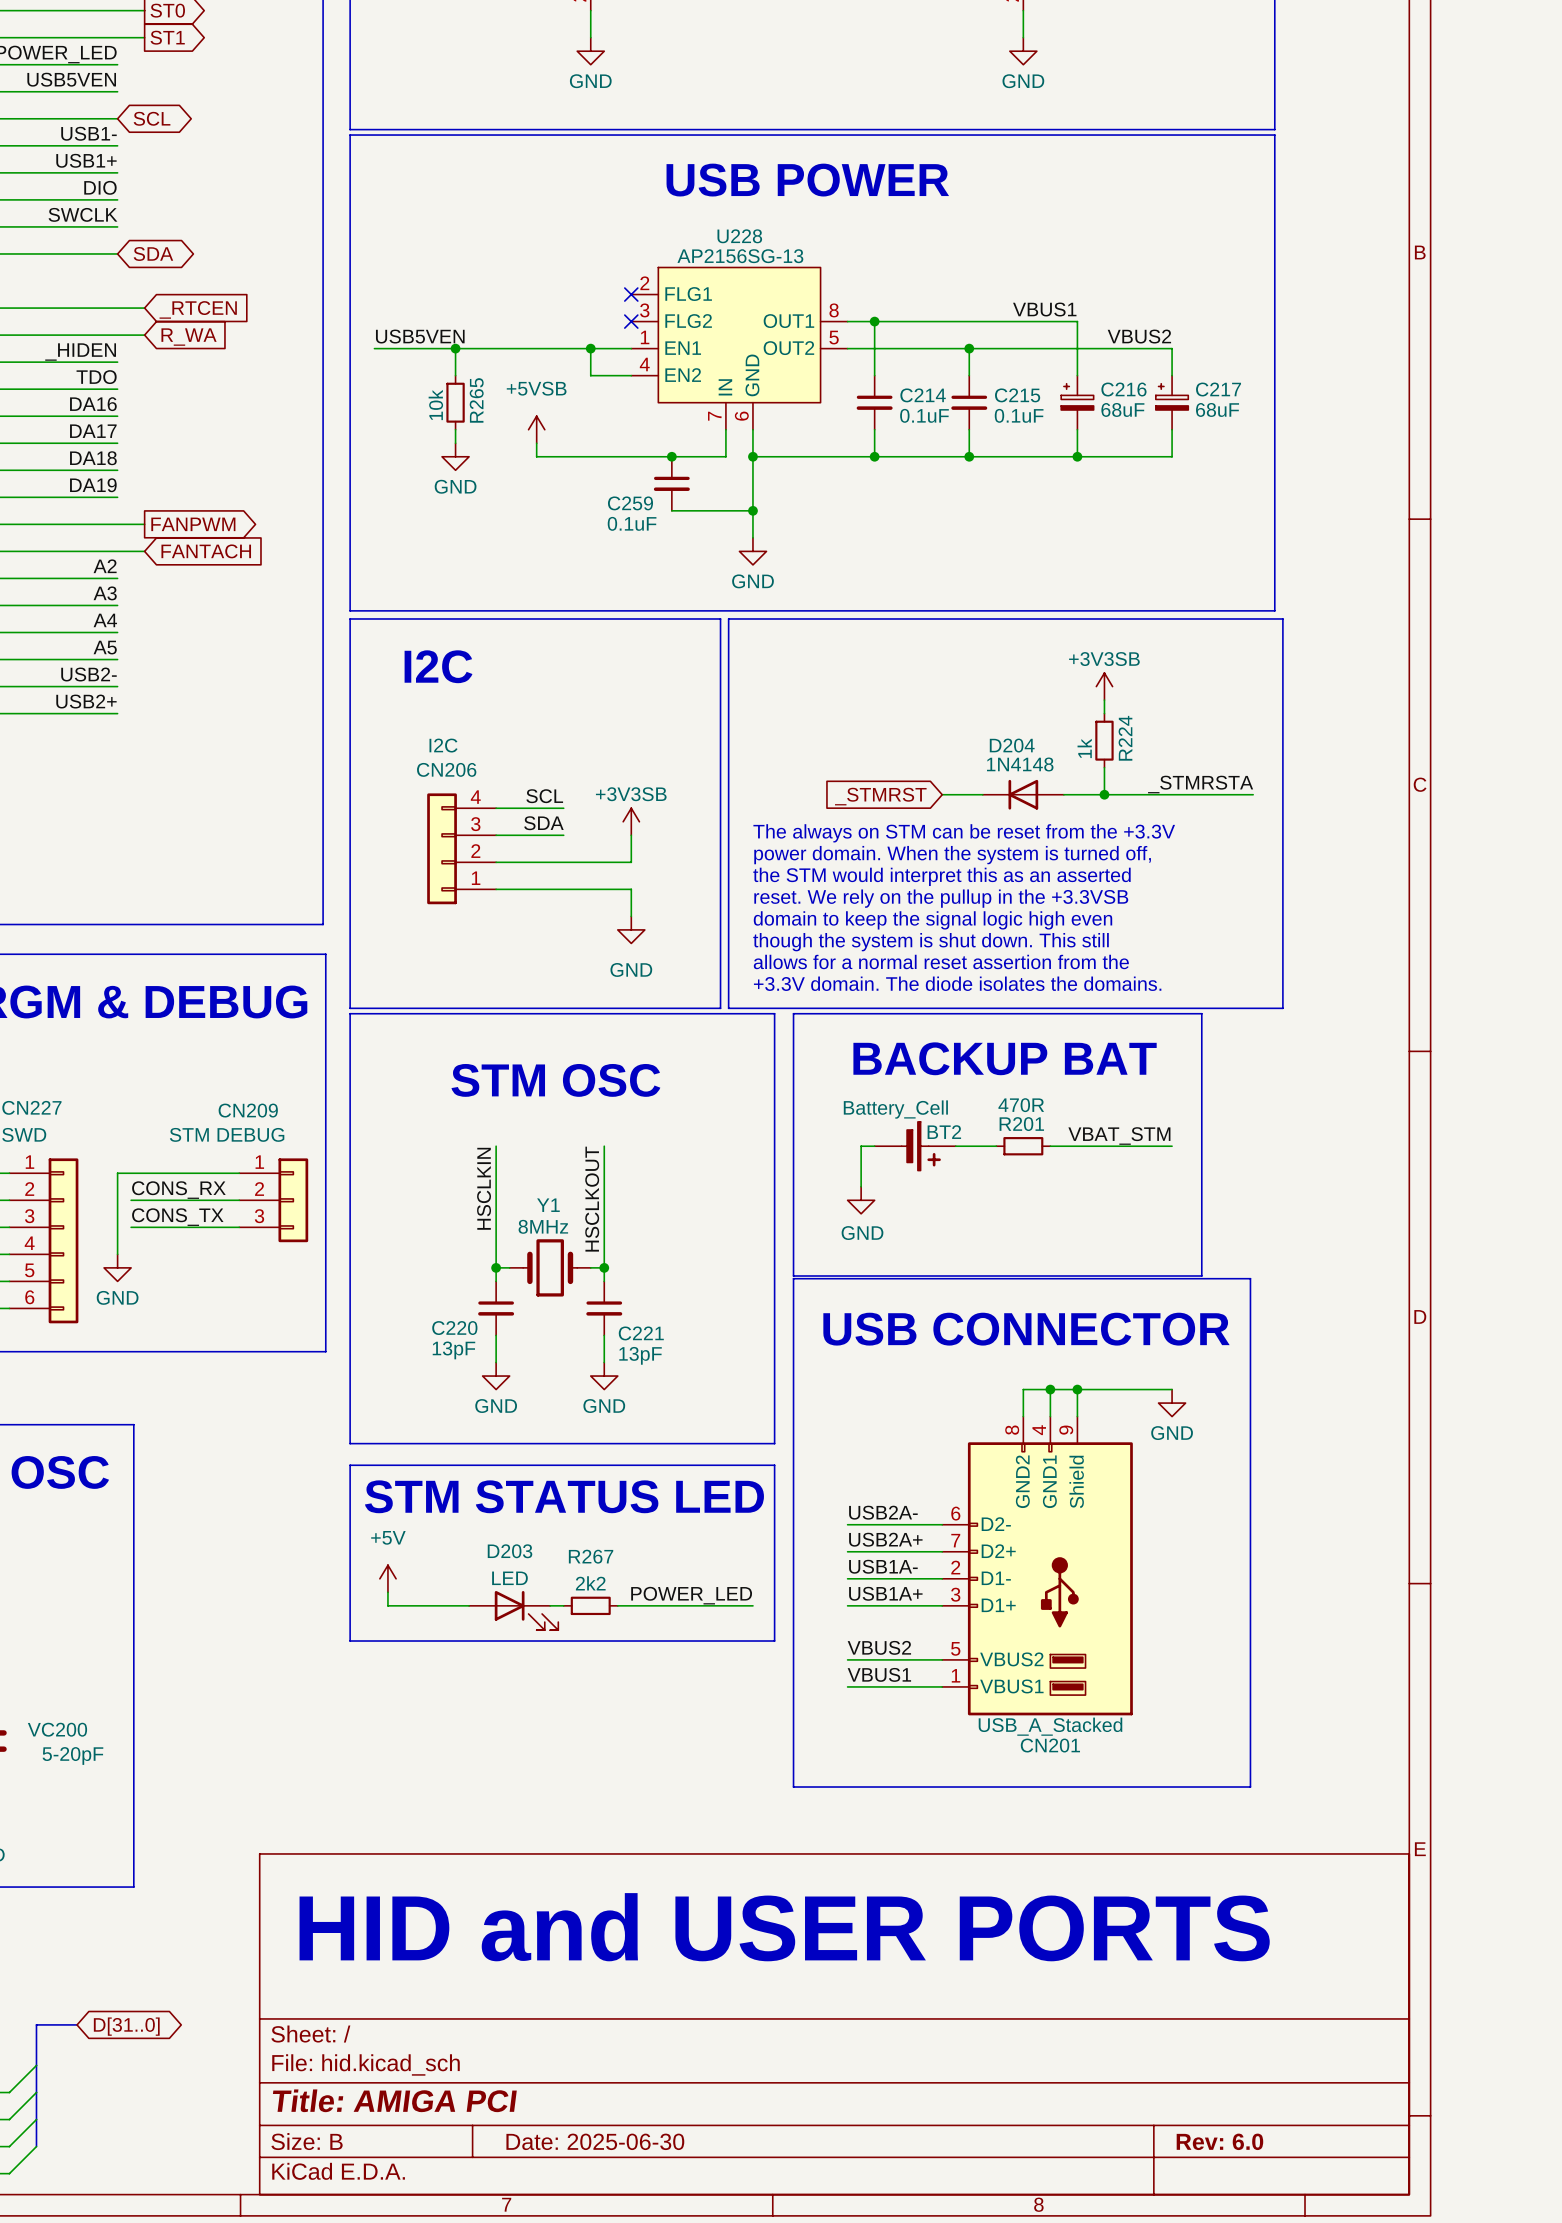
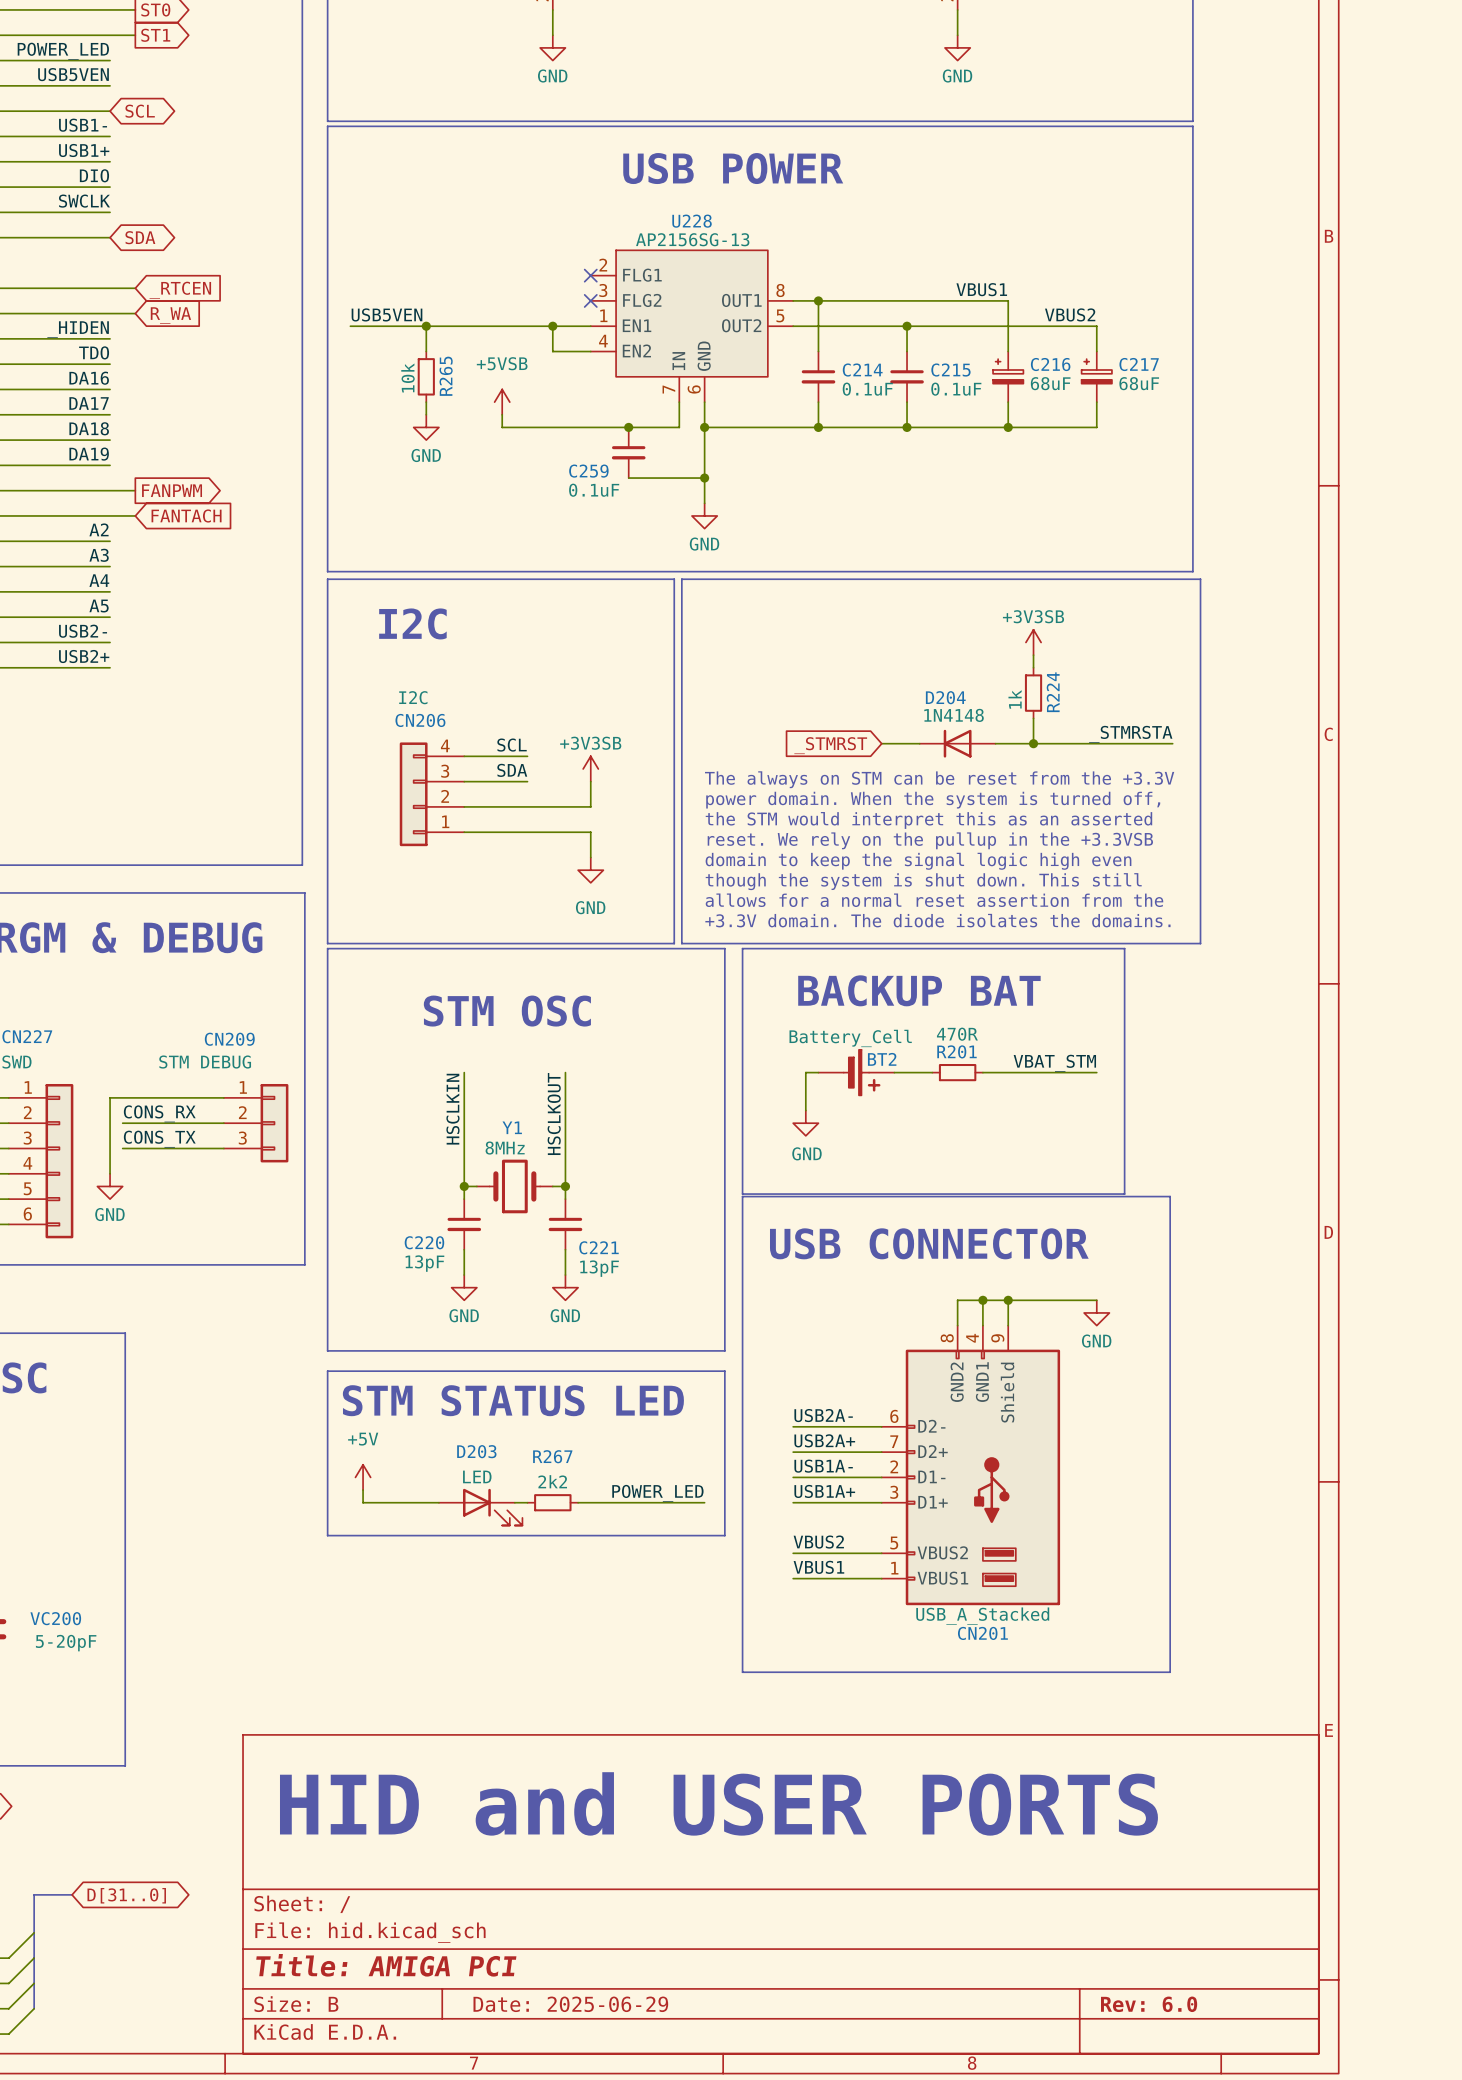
title block: Date: 2025-06-30 (595, 2141) -> Date: 2025-06-29 (570, 2004)

